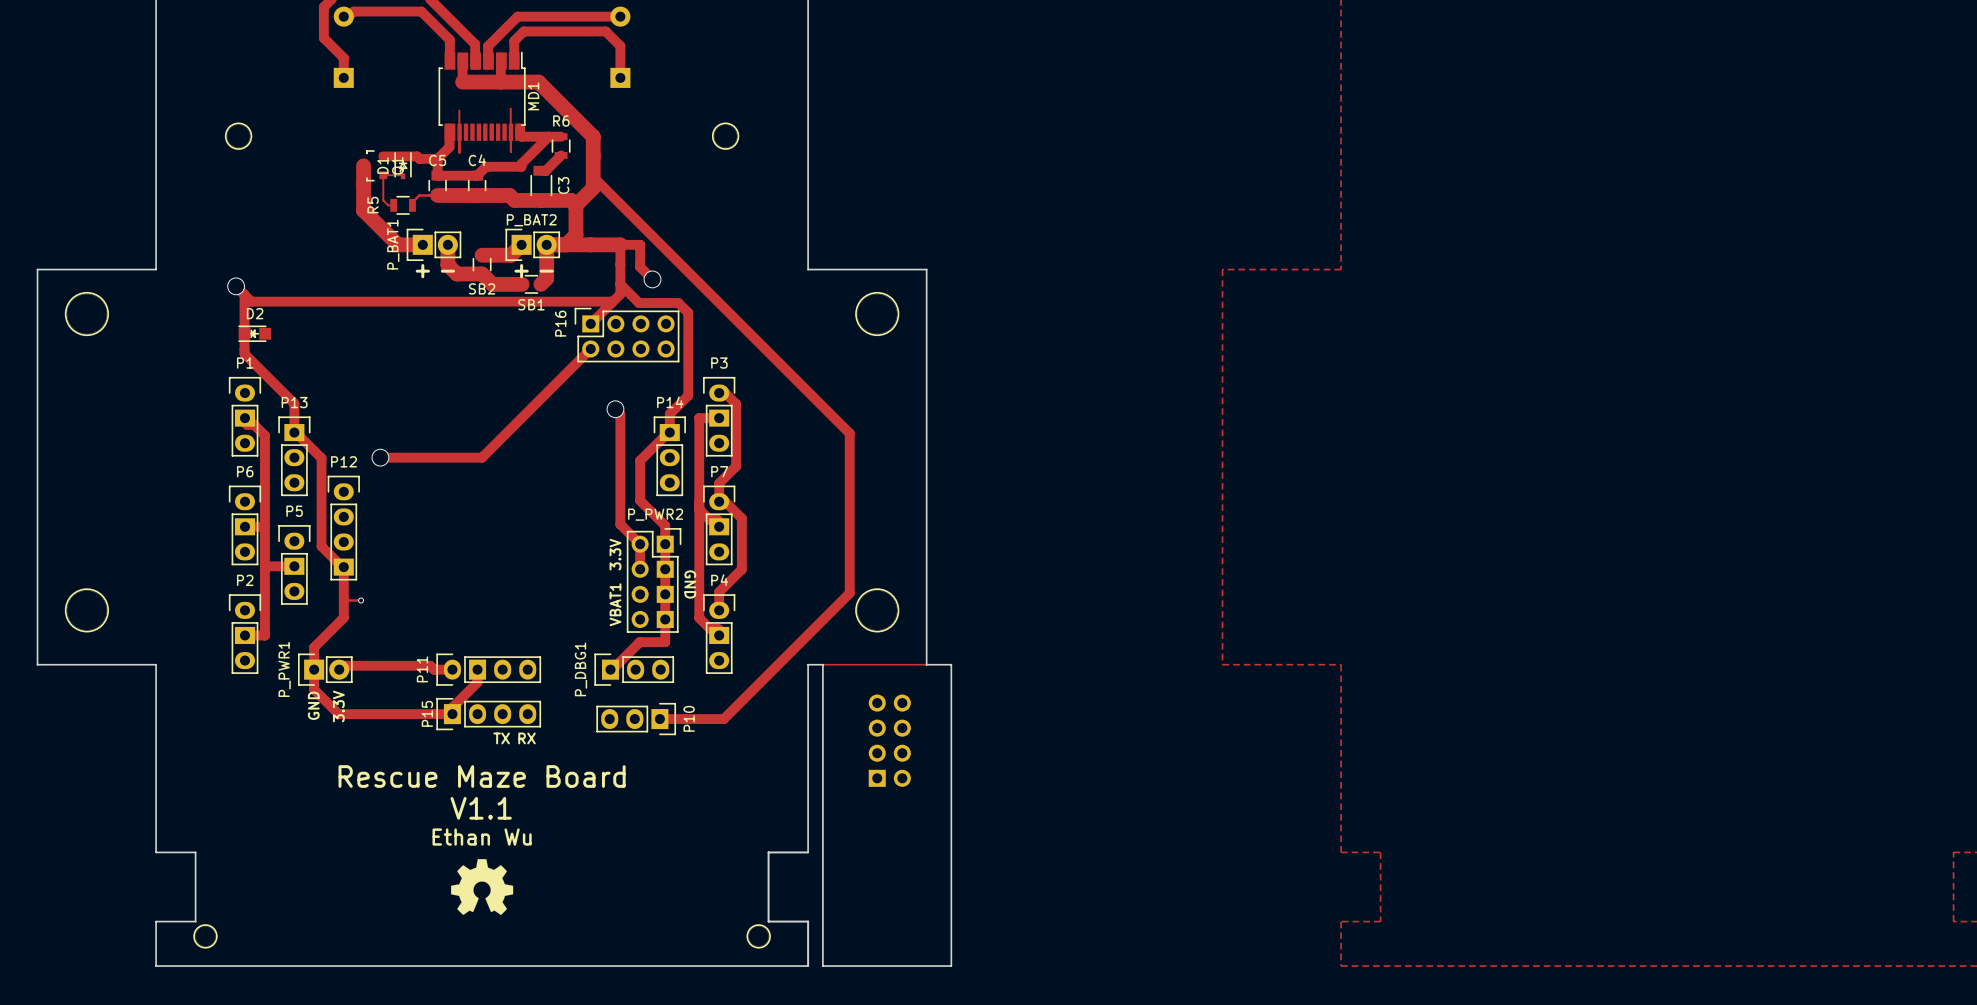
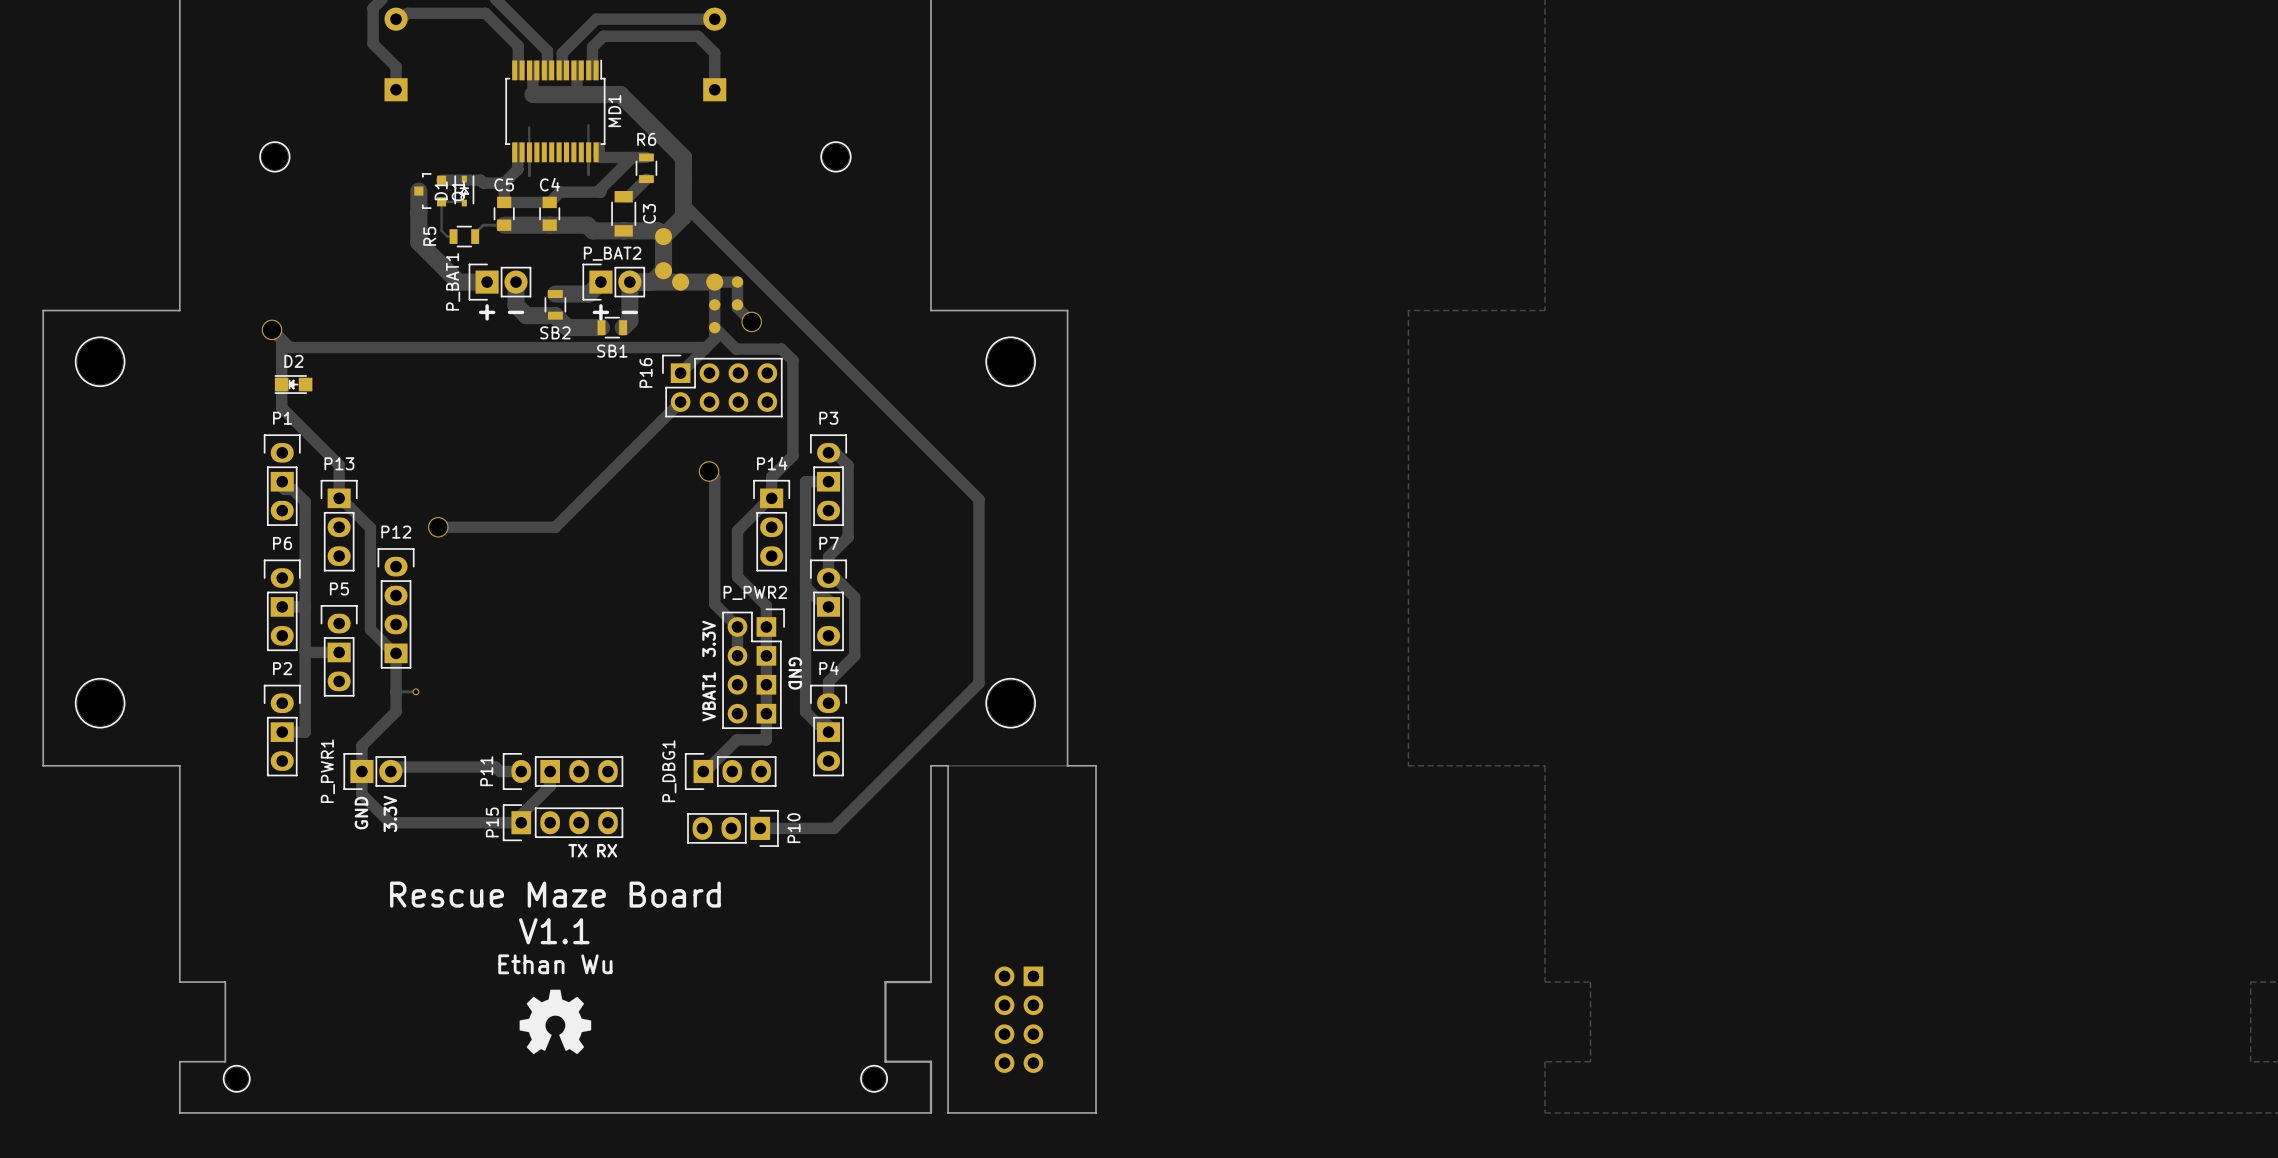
part rotation: 0° (889, 740) -> 180° (1018, 1019)
part position: (889, 740) -> (1018, 1019)

